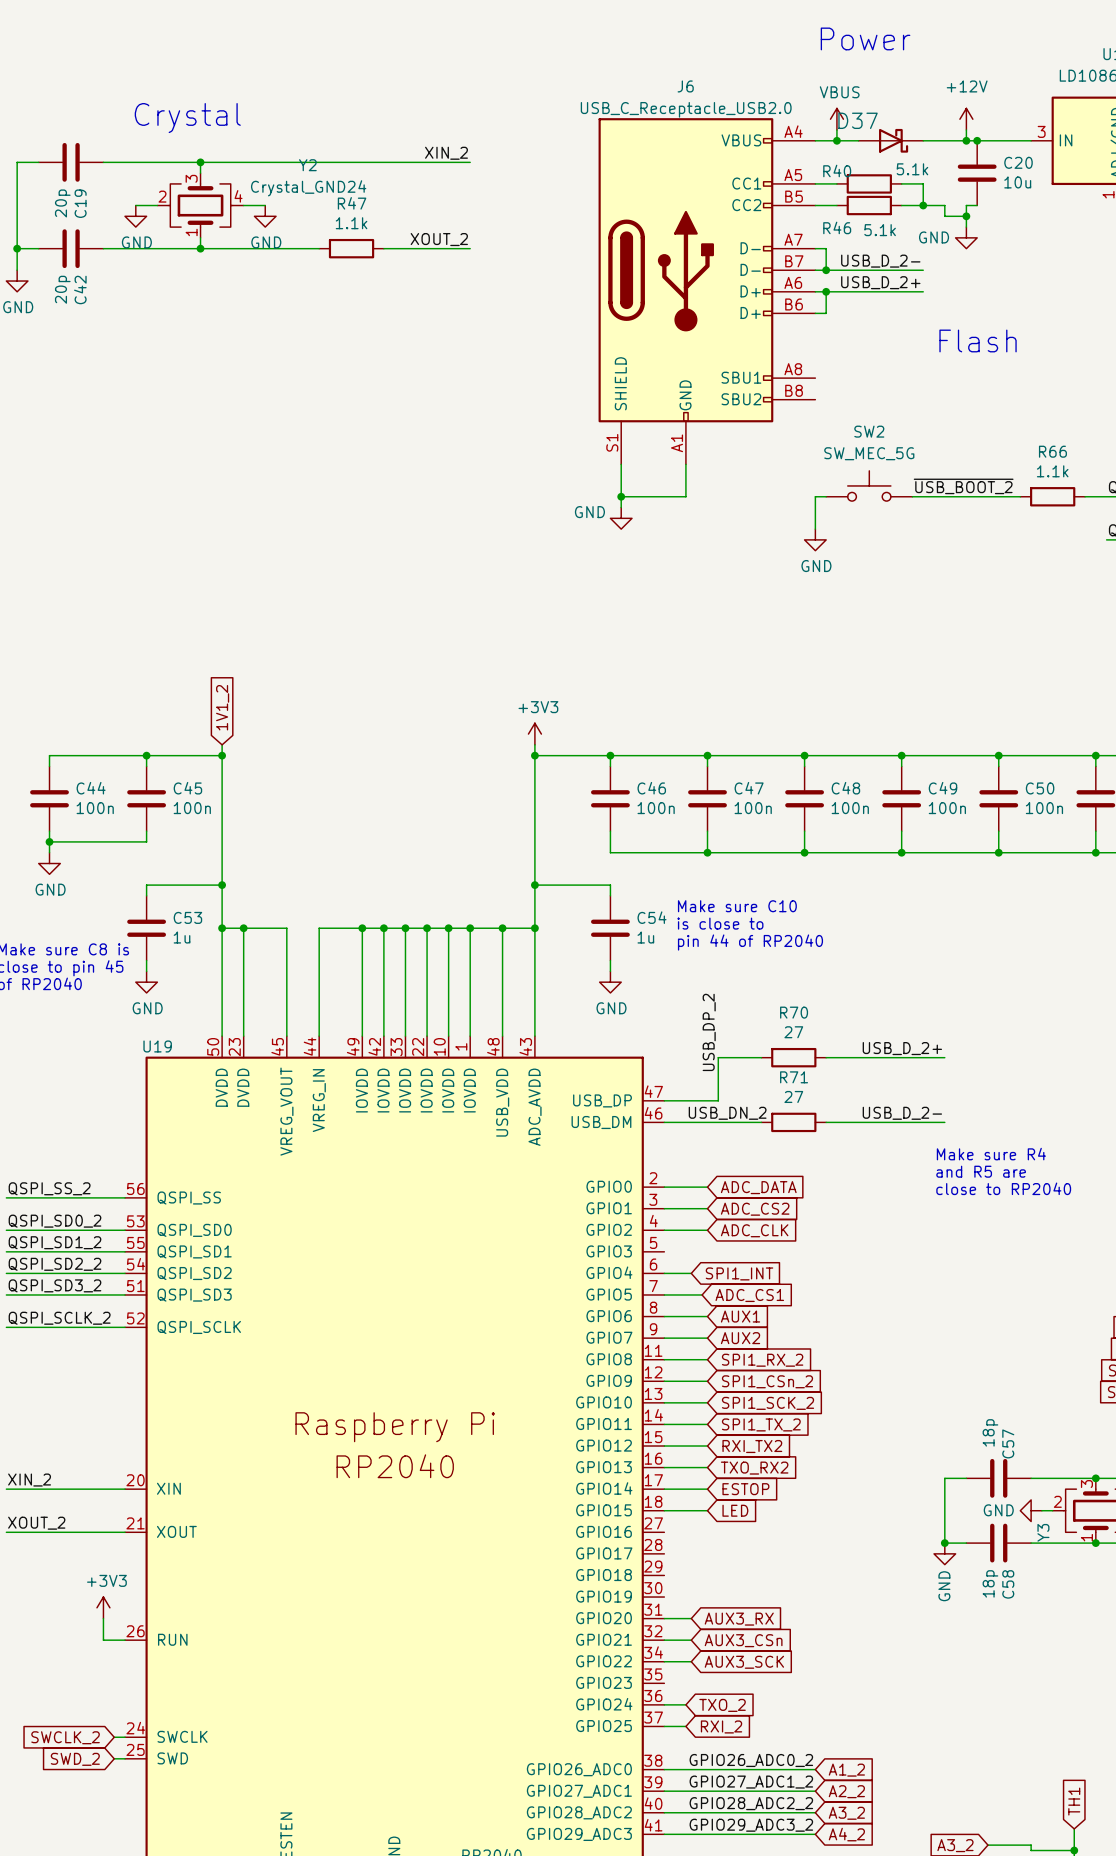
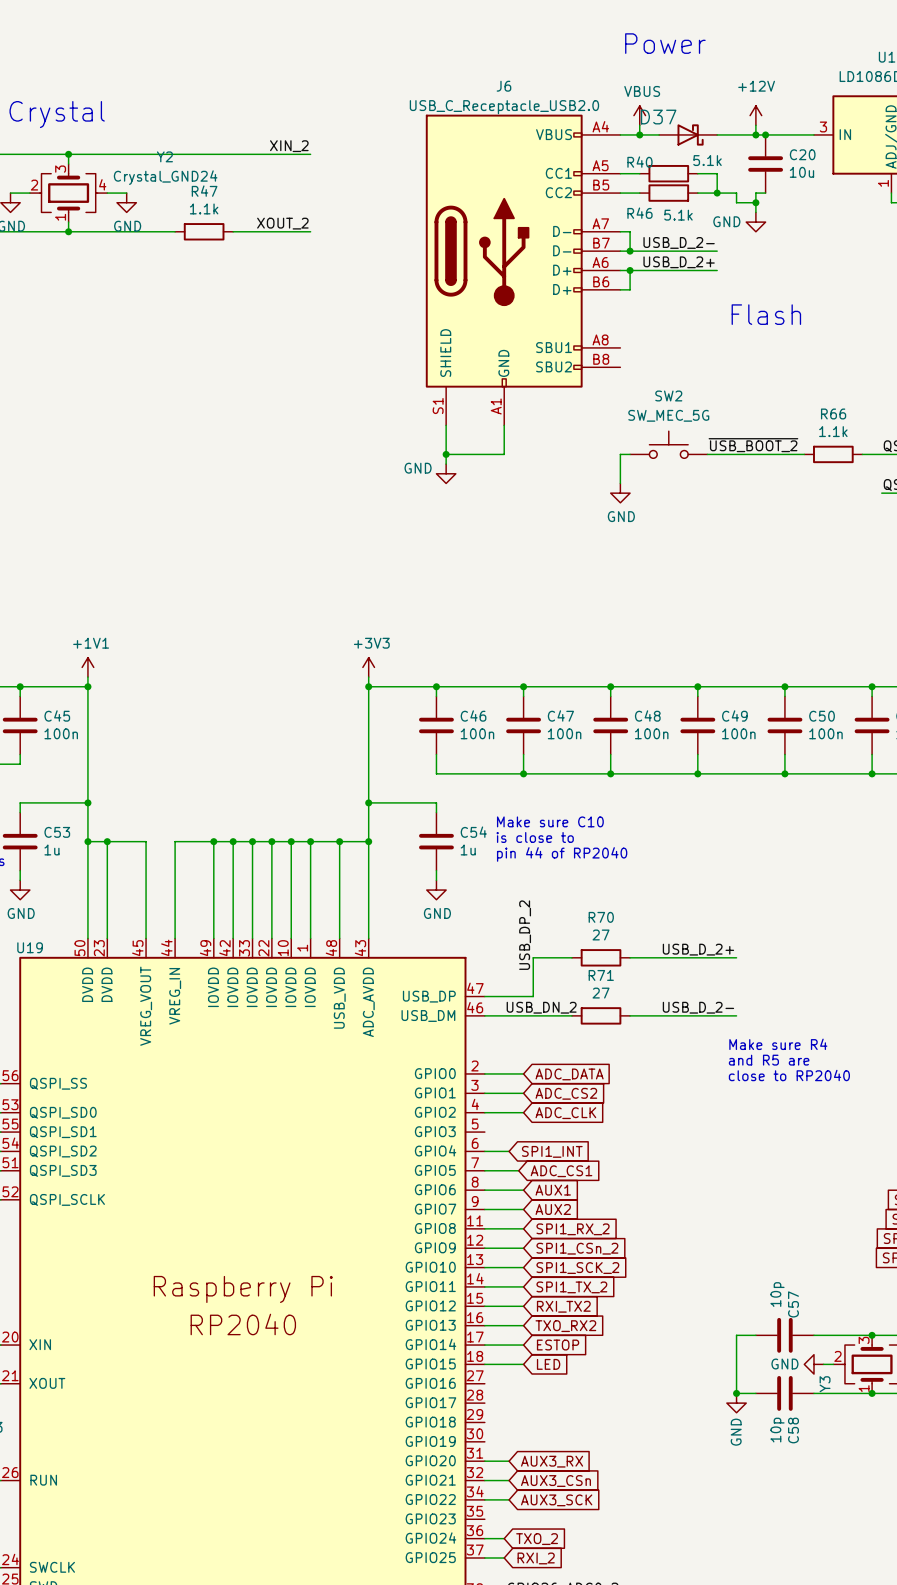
global label: 1V1_2 (222, 707) -> none
power symbol: none -> +1V1 (87, 667)
C57 value: 18p (990, 1432) -> 10p (777, 1294)
C58 value: 18p (990, 1583) -> 10p (777, 1430)

